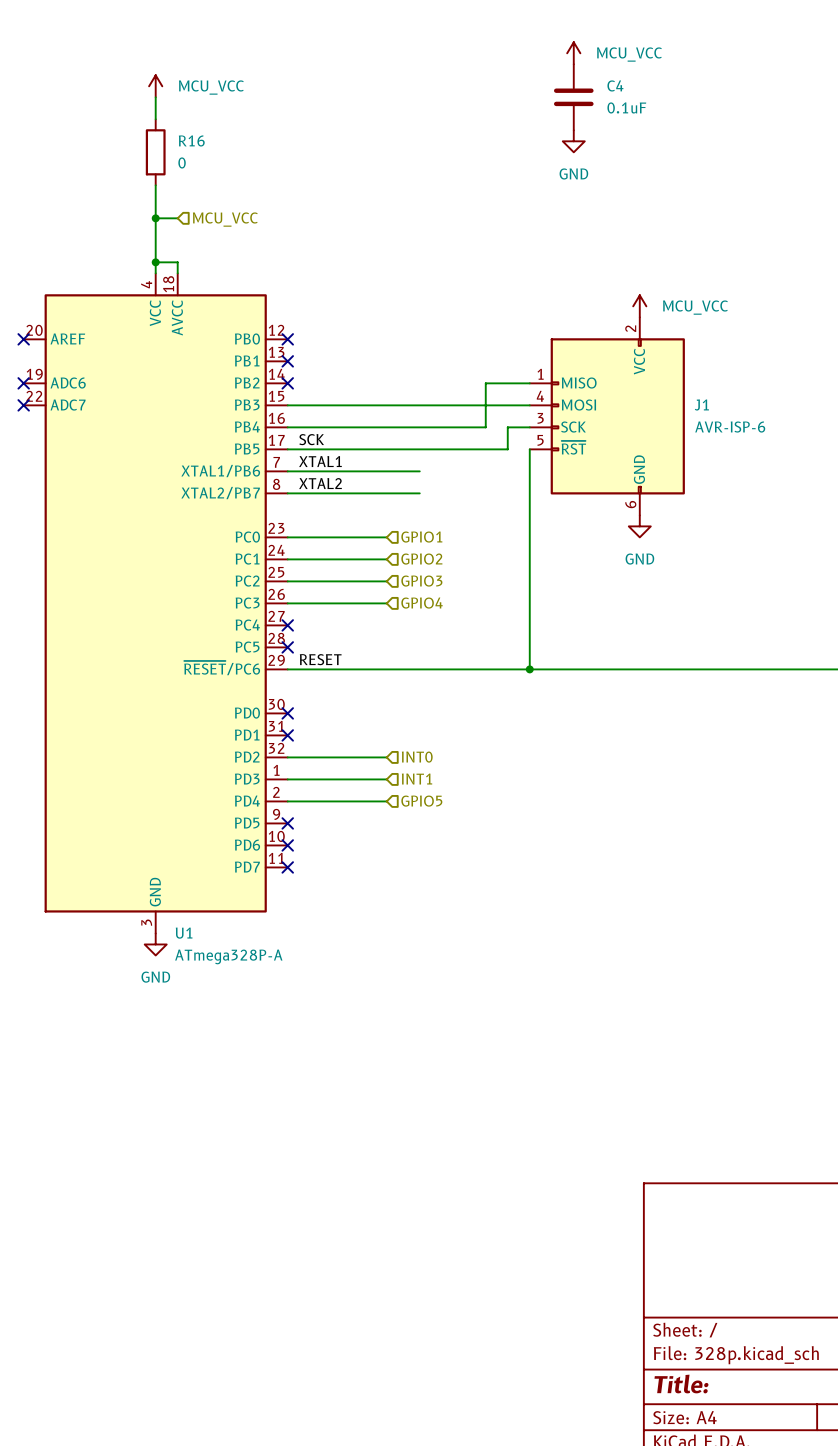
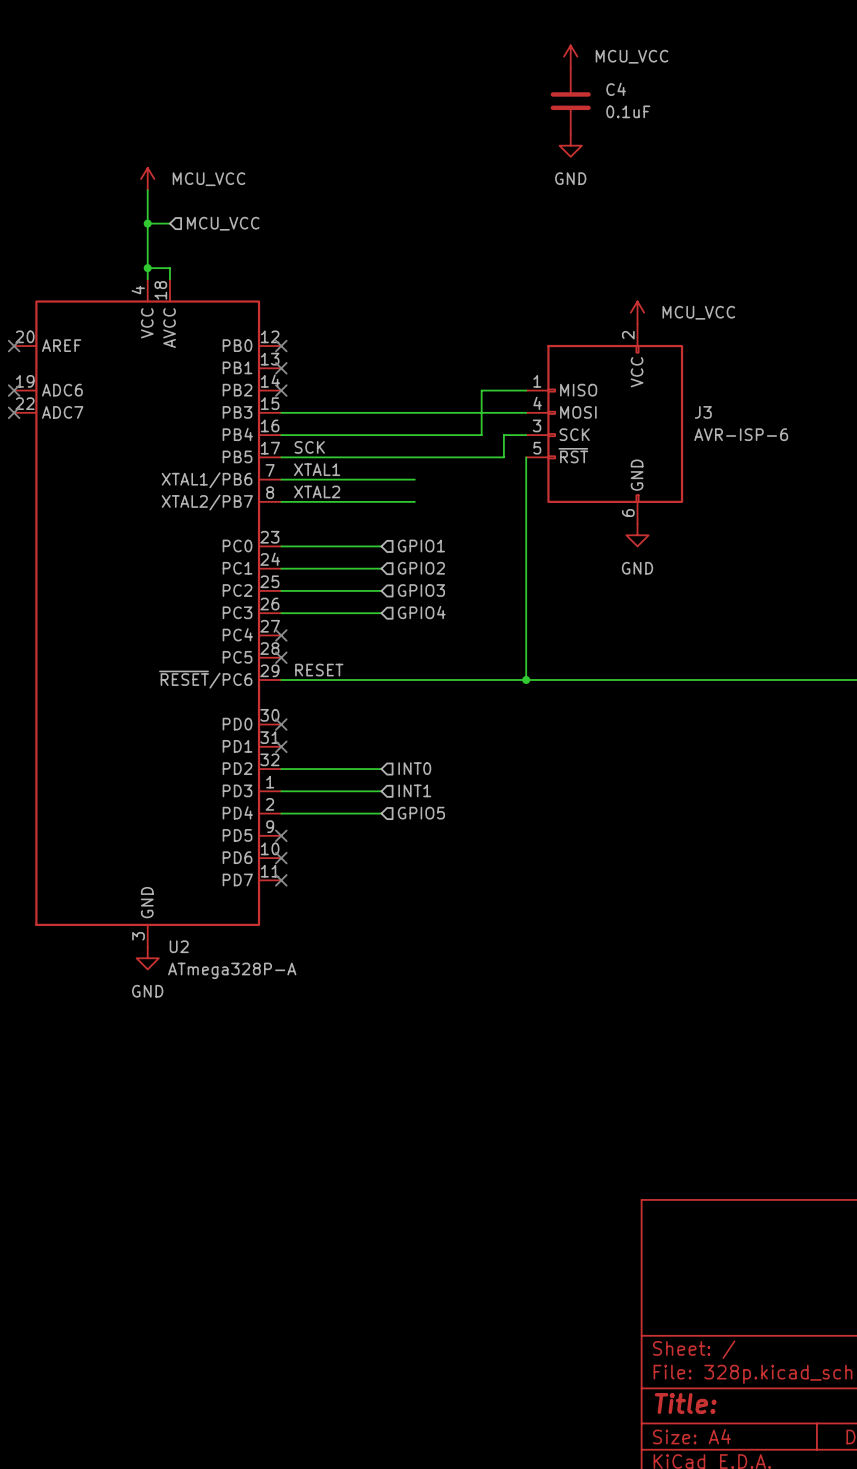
power symbol position: MCU_VCC (155, 86) -> MCU_VCC (147, 179)
wire: (155, 97) (155, 119) -> none
R16: 0 (155, 152) -> none
J1 name: J1 (701, 405) -> J3 (703, 412)
U1 name: U1 (184, 933) -> U2 (179, 946)

